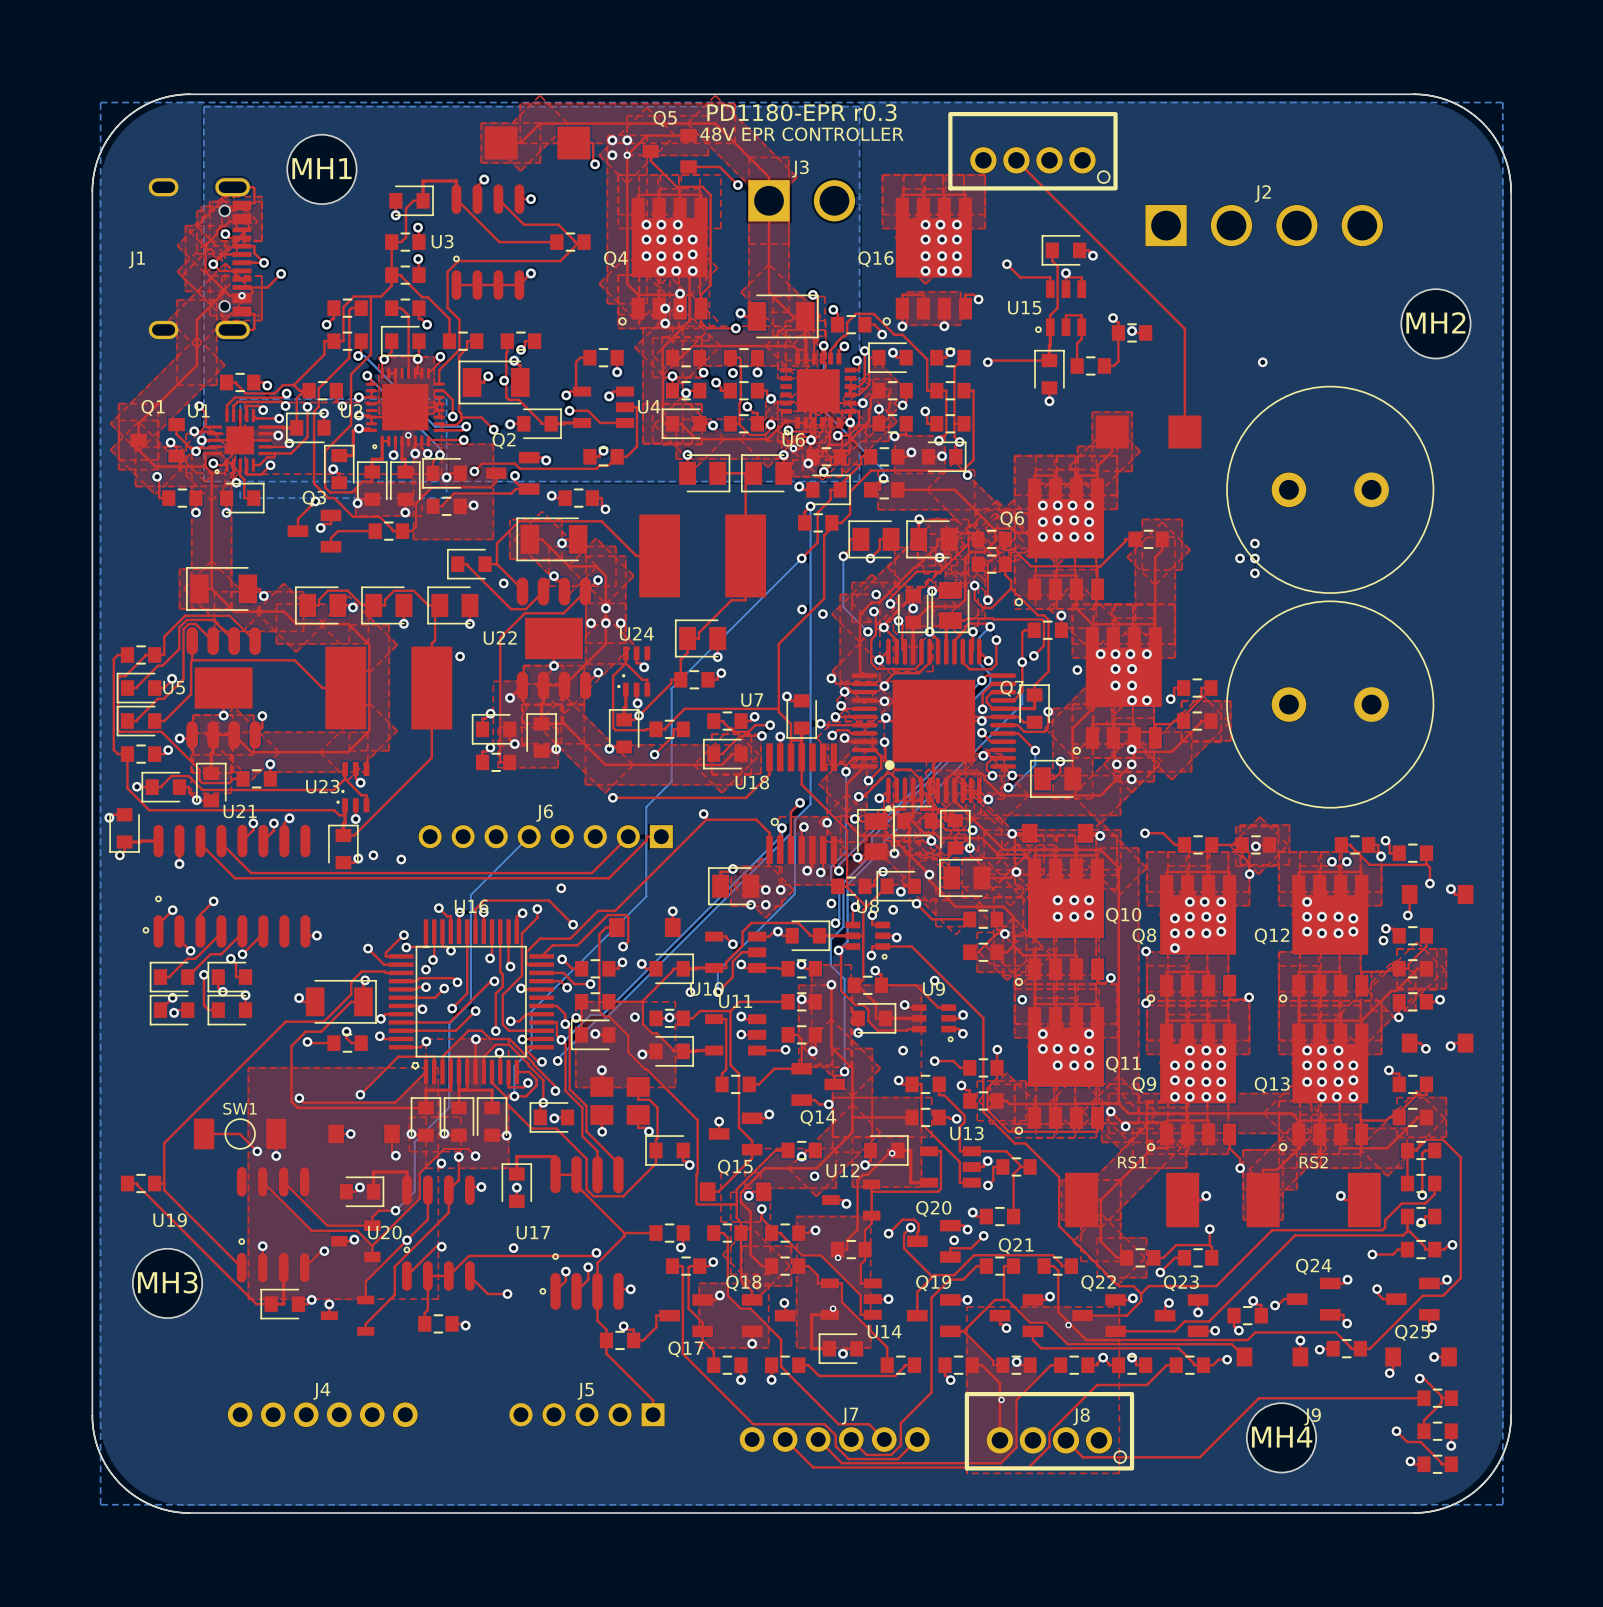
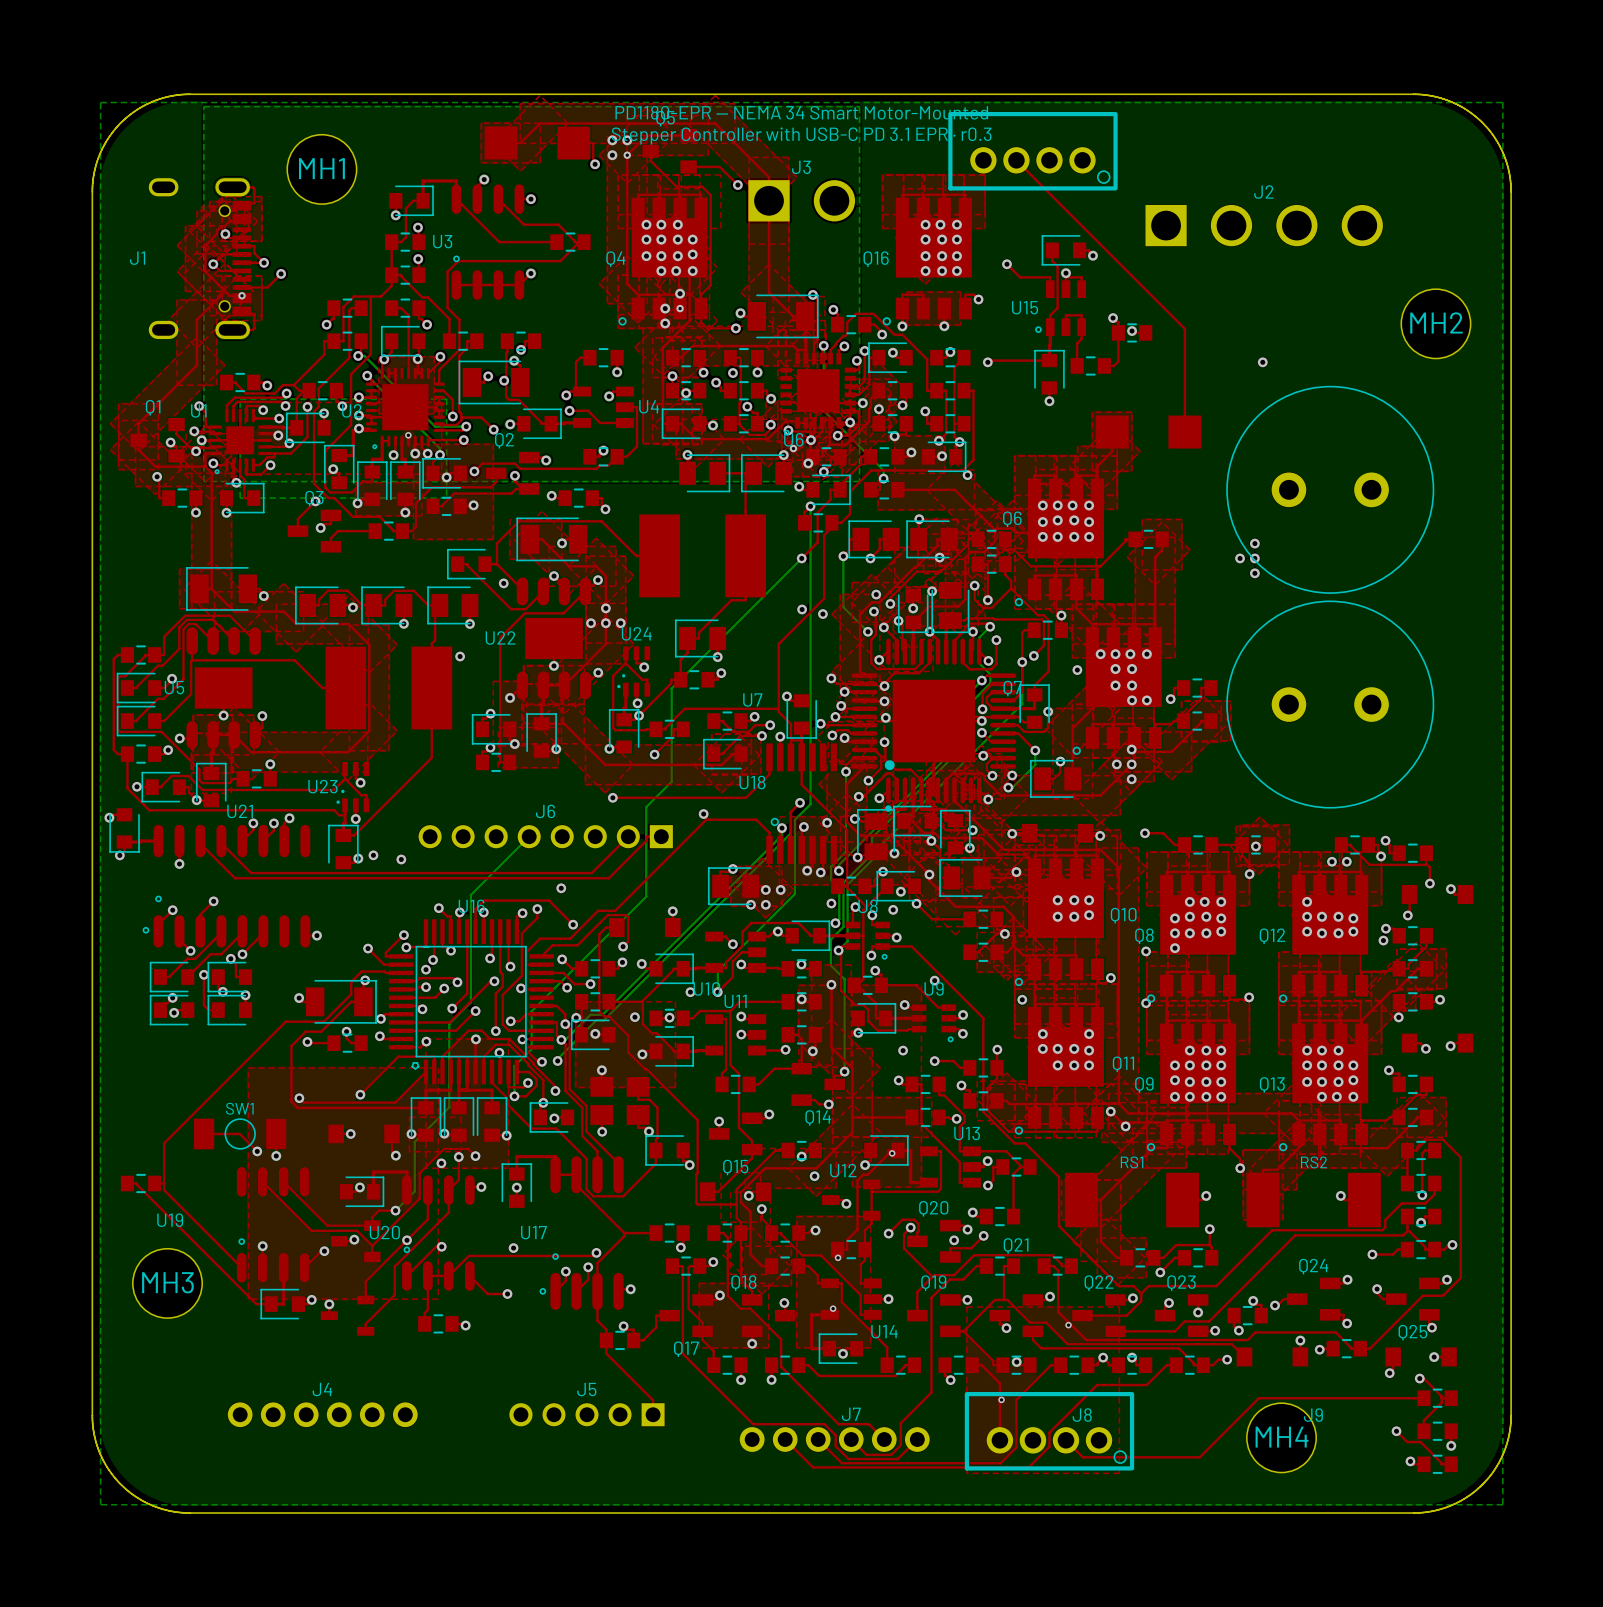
text: PD1180-EPR r0.3 (801, 112) -> PD1180-EPR — NEMA 34 Smart Motor-Mounted (801, 112)
text: 48V EPR CONTROLLER (801, 134) -> Stepper Controller with USB-C PD 3.1 EPR · r0.3 (801, 135)

